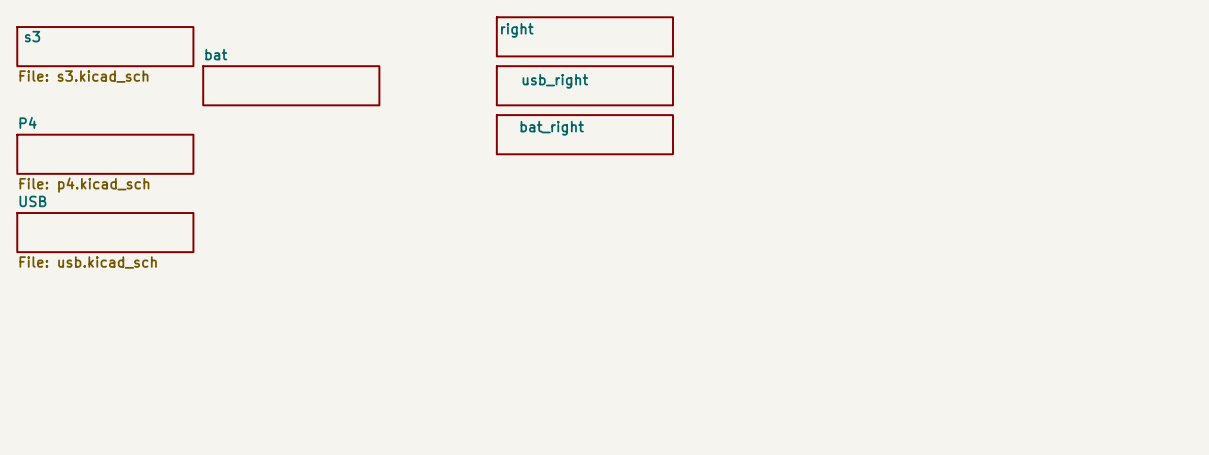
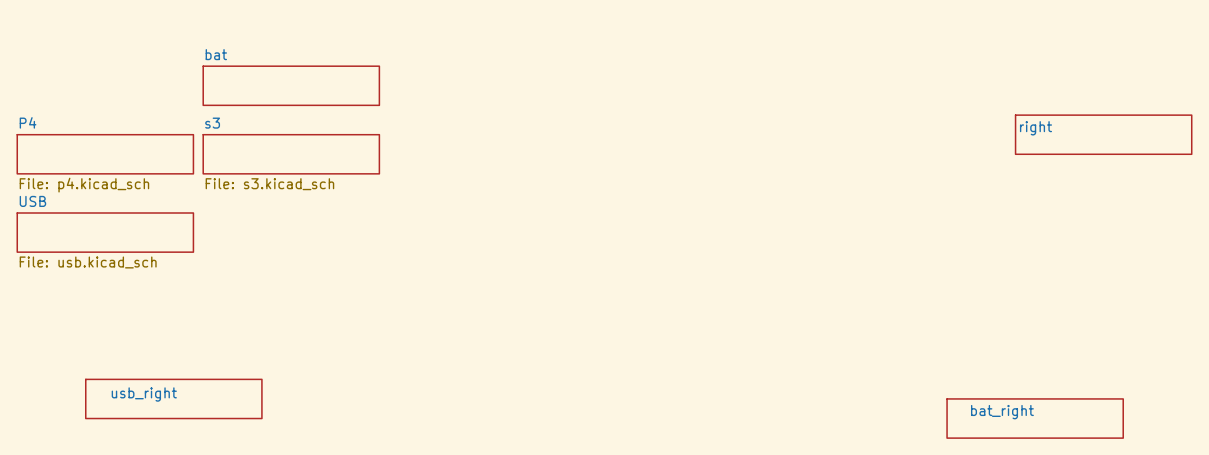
sheet s3 name position: s3 (32, 36) -> s3 (212, 123)
sheet right: (584, 36) -> none
sheet s3 position: (105, 46) -> (291, 154)
sheet usb_right: (584, 85) -> none
sheet bat_right: (584, 134) -> none
sheet right: none -> (1103, 134)
sheet usb_right: none -> (173, 398)
sheet bat_right: none -> (1035, 418)

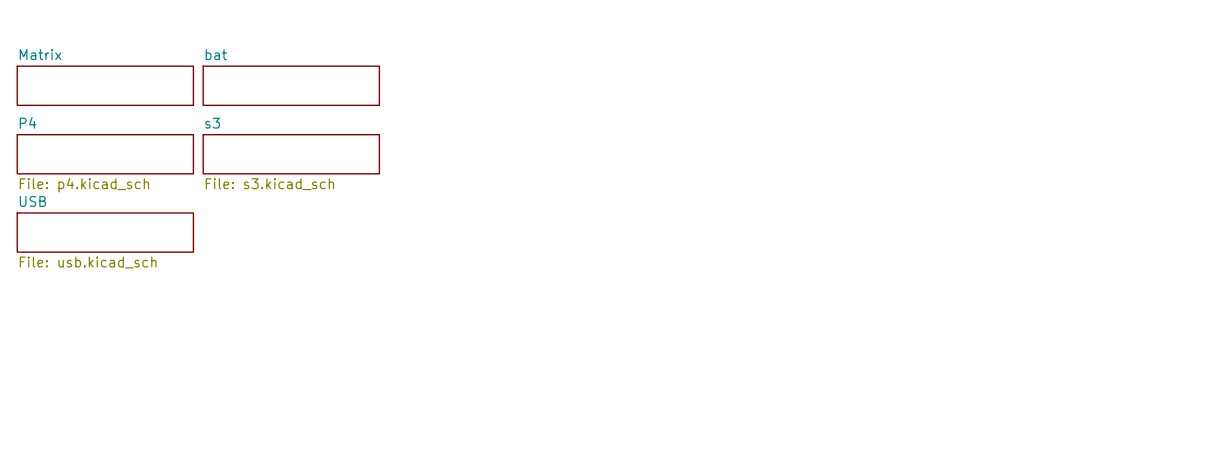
sheet Matrix: none -> (105, 85)
sheet right: (1103, 134) -> none
sheet usb_right: (173, 398) -> none
sheet bat_right: (1035, 418) -> none

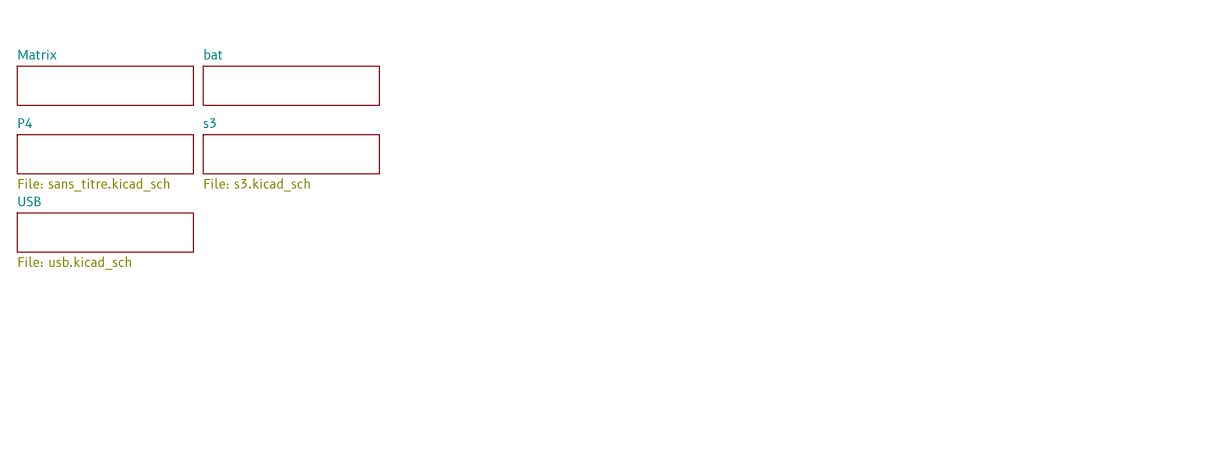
sheet P4 value: File: p4.kicad_sch (84, 185) -> File: sans_titre.kicad_sch (93, 184)

